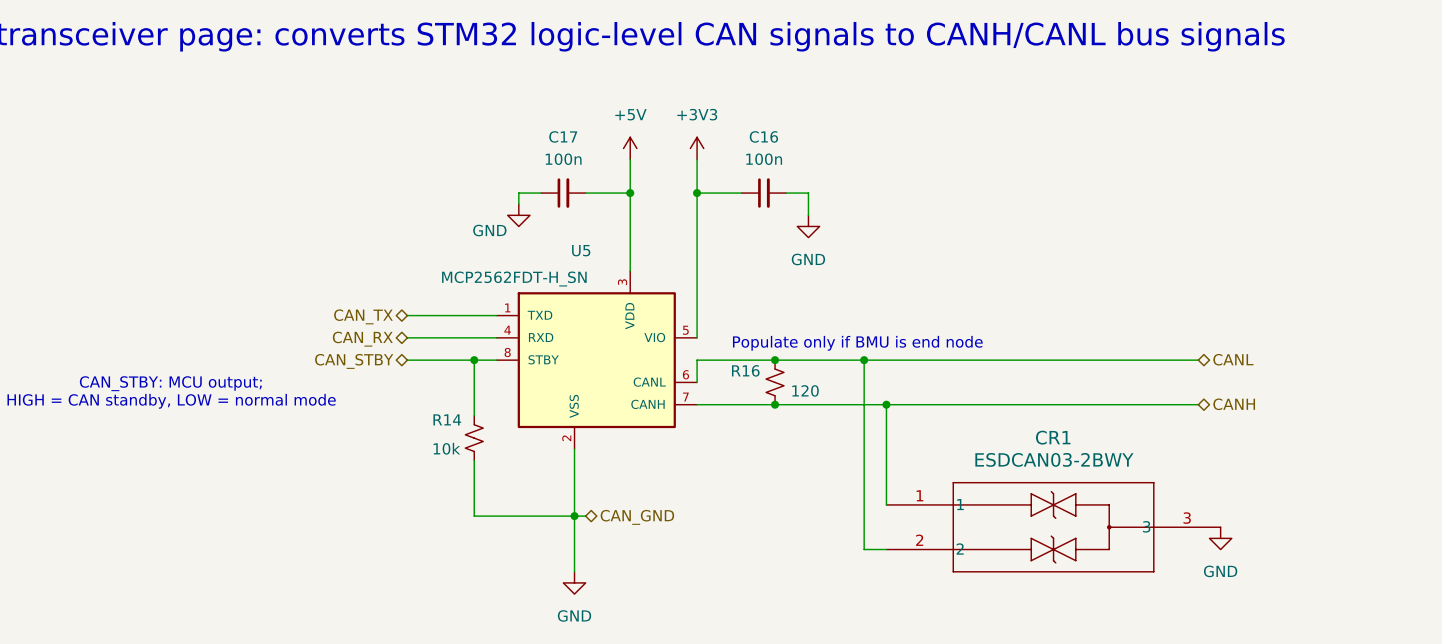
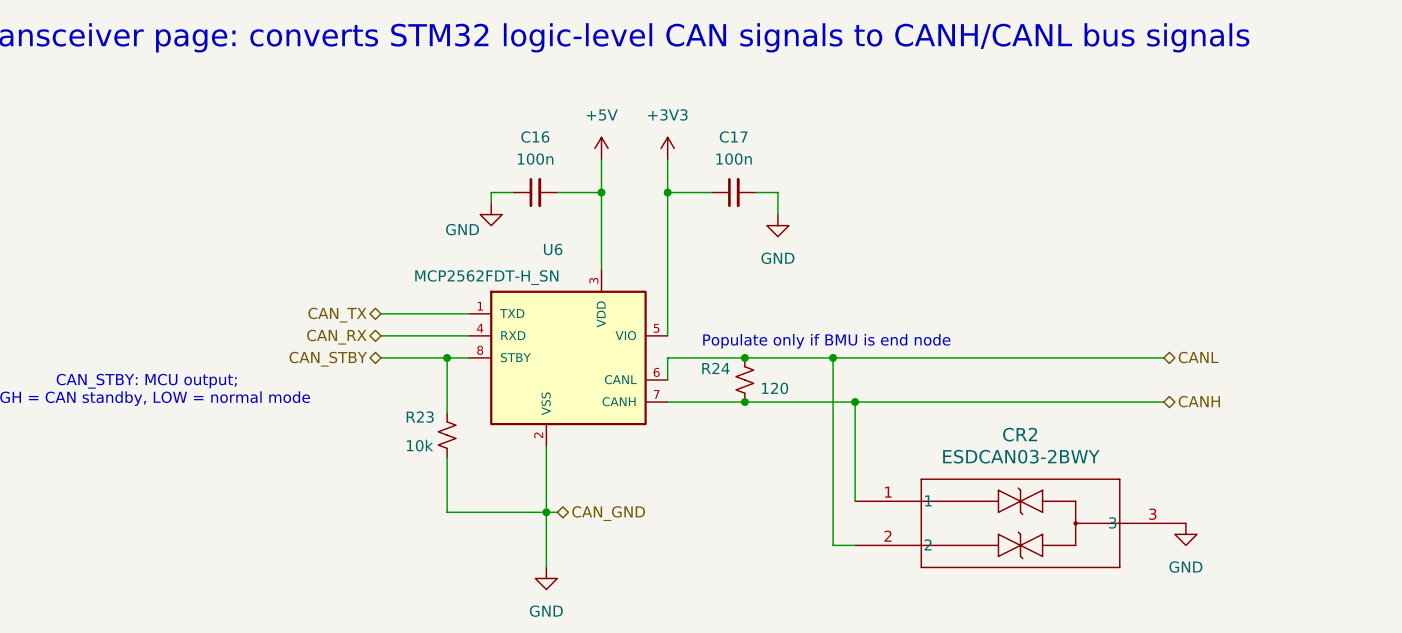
C17 name: C17 (563, 136) -> C16 (535, 137)
C16 name: C16 (763, 136) -> C17 (733, 137)
U5 name: U5 (581, 250) -> U6 (553, 249)
R16 name: R16 (745, 370) -> R24 (715, 368)
R14 name: R14 (447, 419) -> R23 (420, 417)
CR1 name: CR1 (1053, 437) -> CR2 (1020, 434)

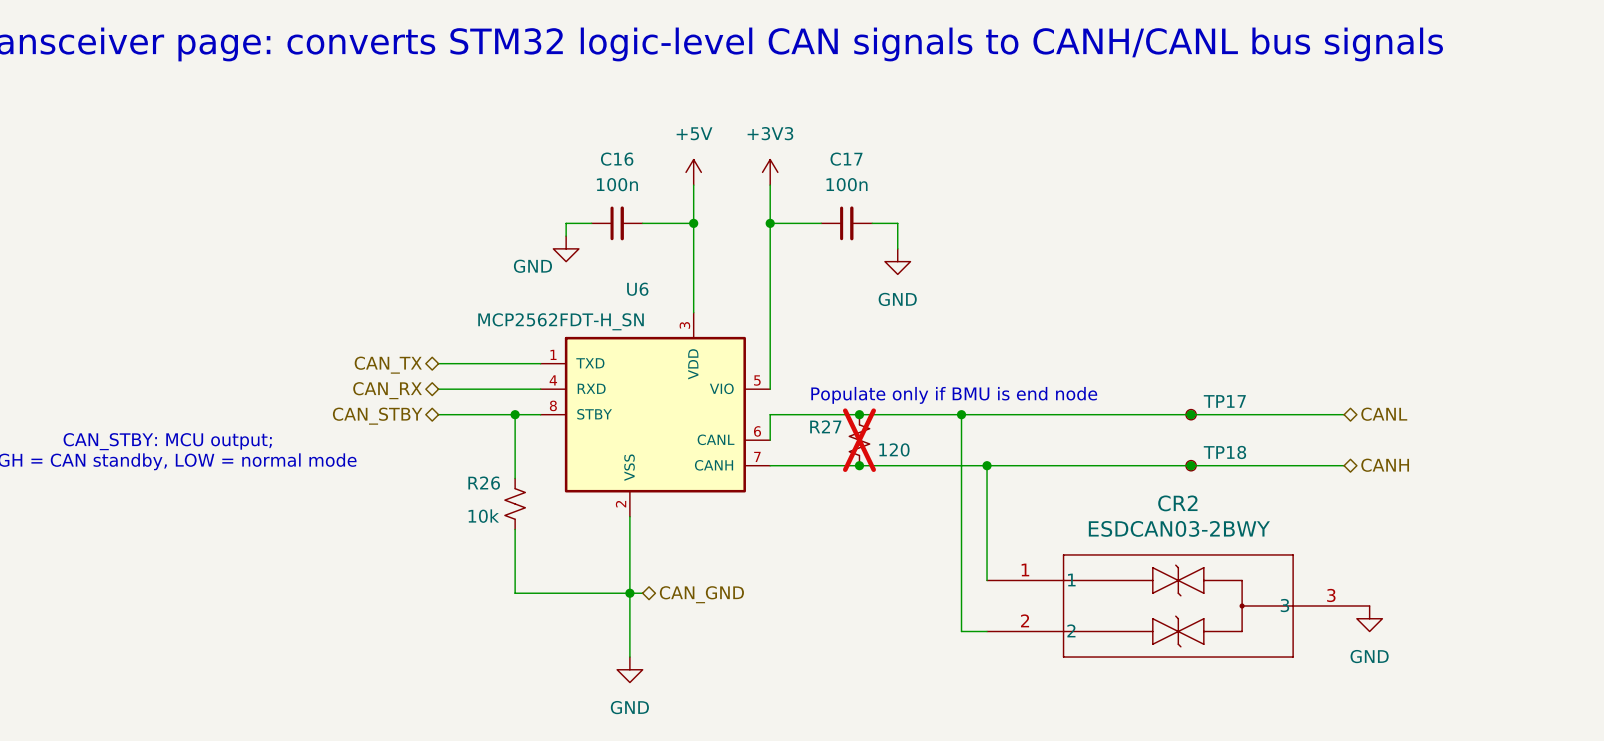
TP17: none -> (1191, 414)
junction: none -> (1191, 414)
R24 name: R24 (715, 368) -> R27 (825, 426)
R24 do-not-place cross: none -> (859, 440)
TP18: none -> (1191, 465)
junction: none -> (1191, 465)
R23 name: R23 (420, 417) -> R26 (484, 483)

